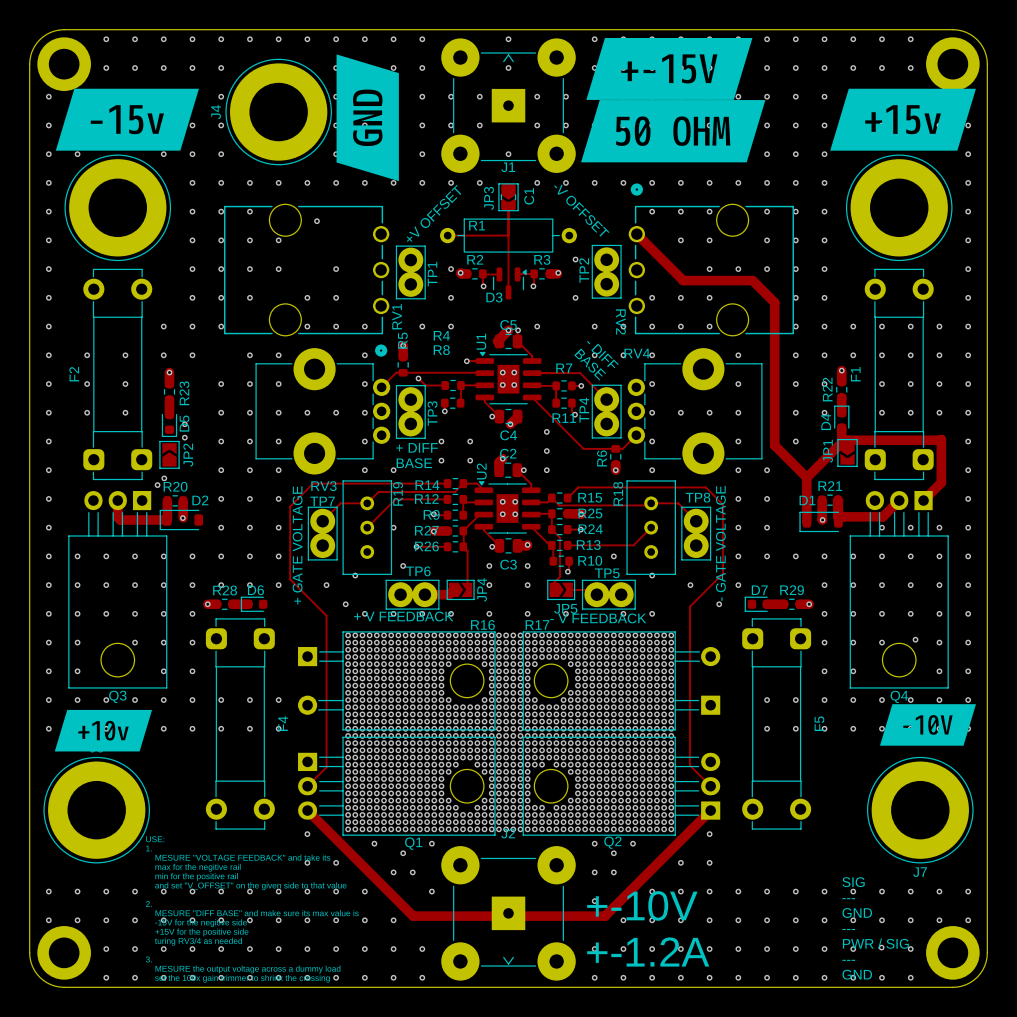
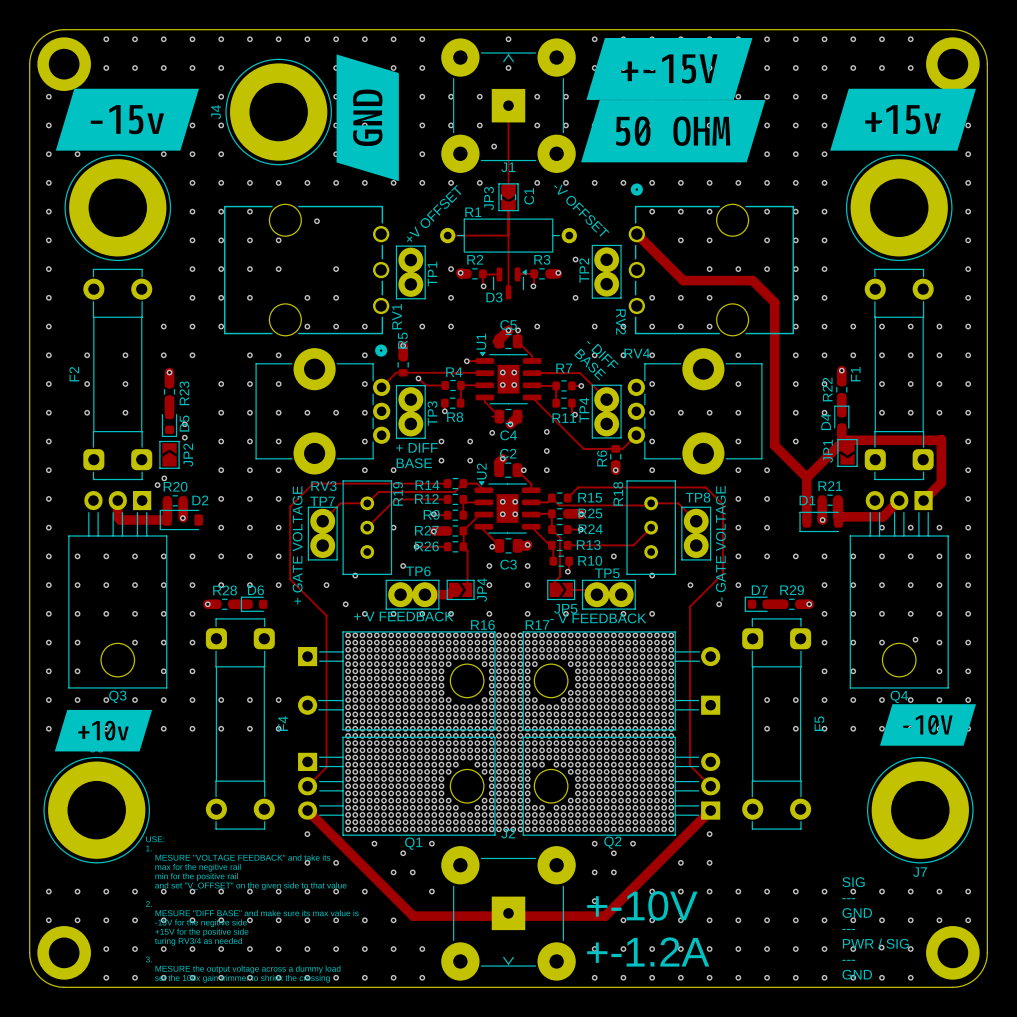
top track: none -> (508, 105) (508, 188)
via position: (508, 154) -> (494, 146)
R1 name position: R1 (477, 225) -> R1 (473, 212)
R4 name position: R4 (441, 335) -> R4 (454, 372)
R8 name position: R8 (441, 350) -> R8 (455, 417)
via position: (492, 416) -> (492, 432)

